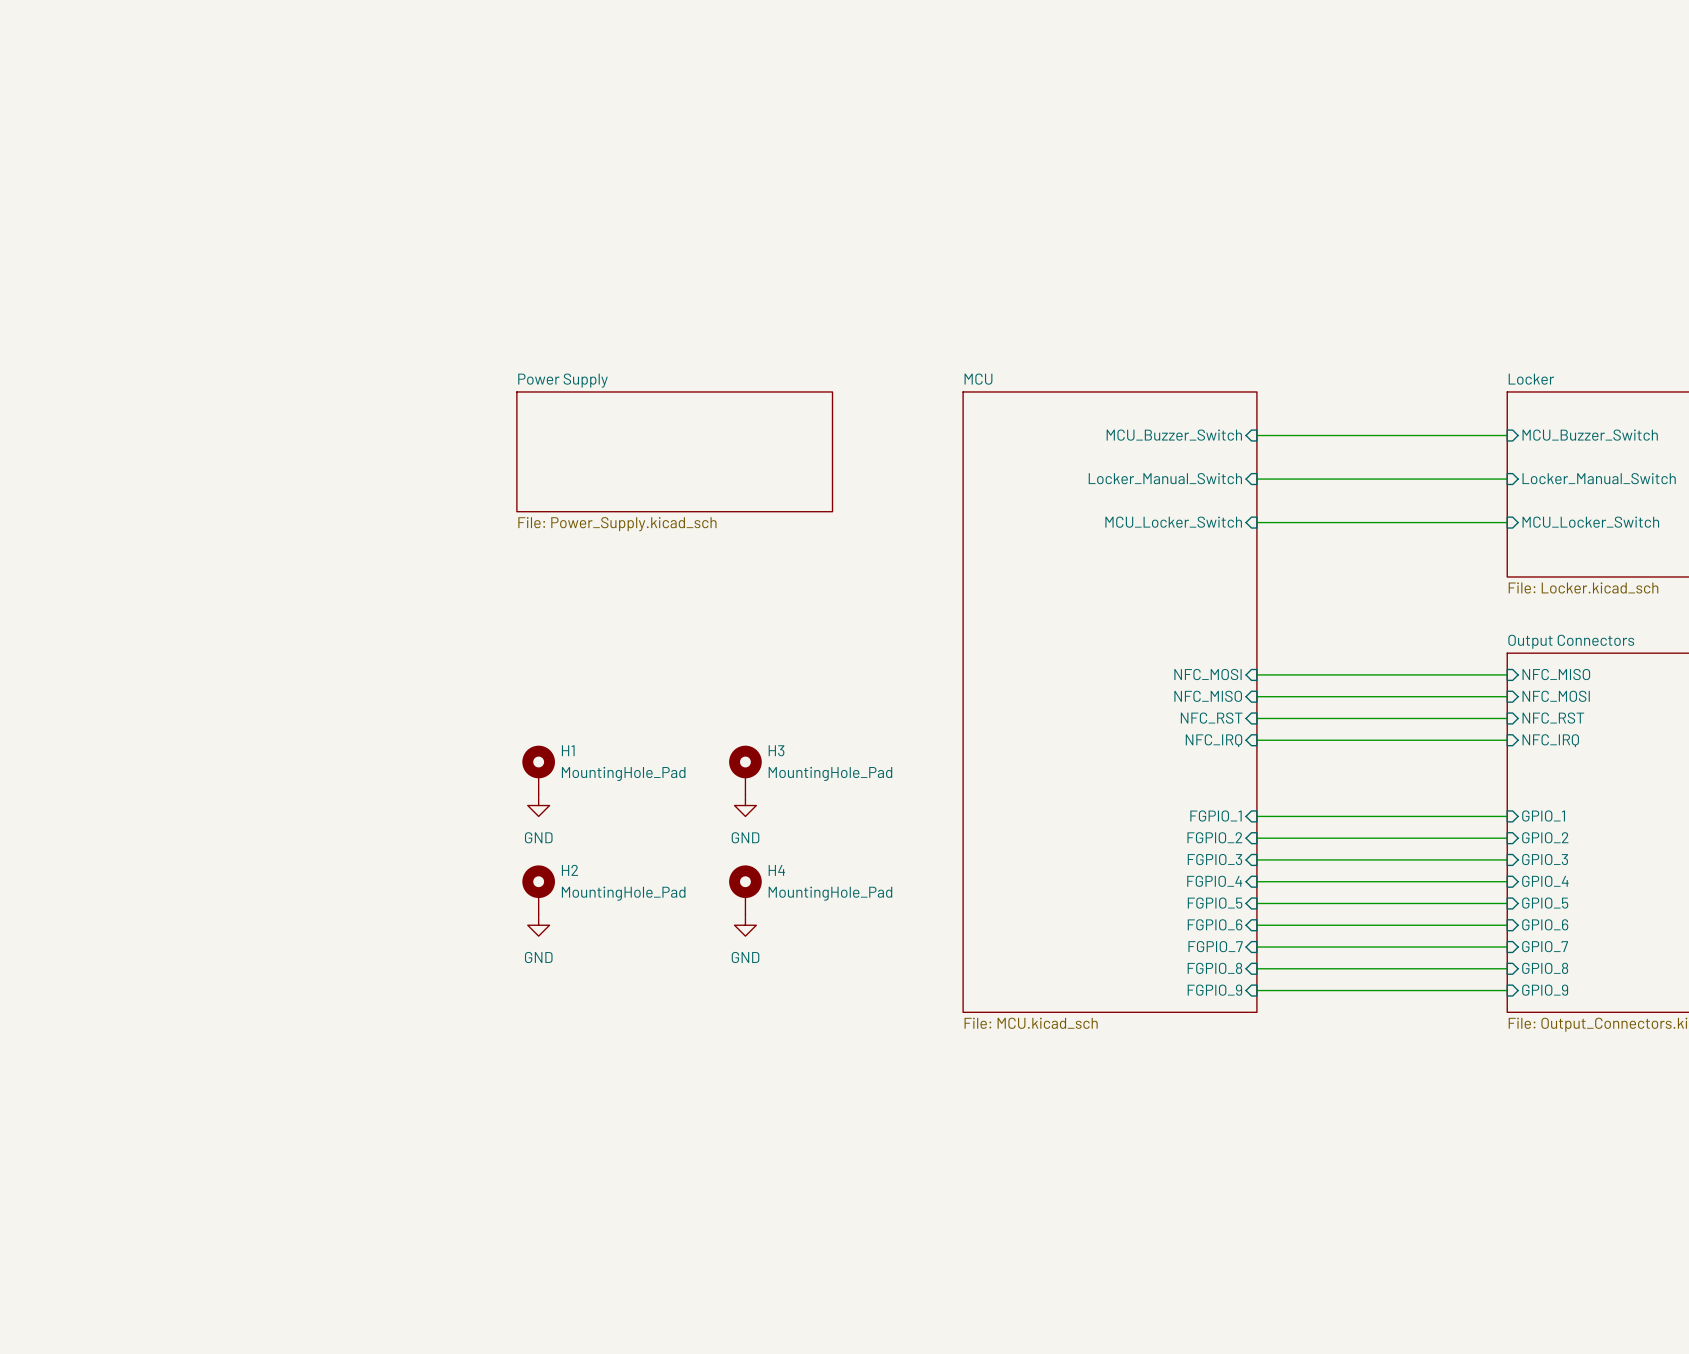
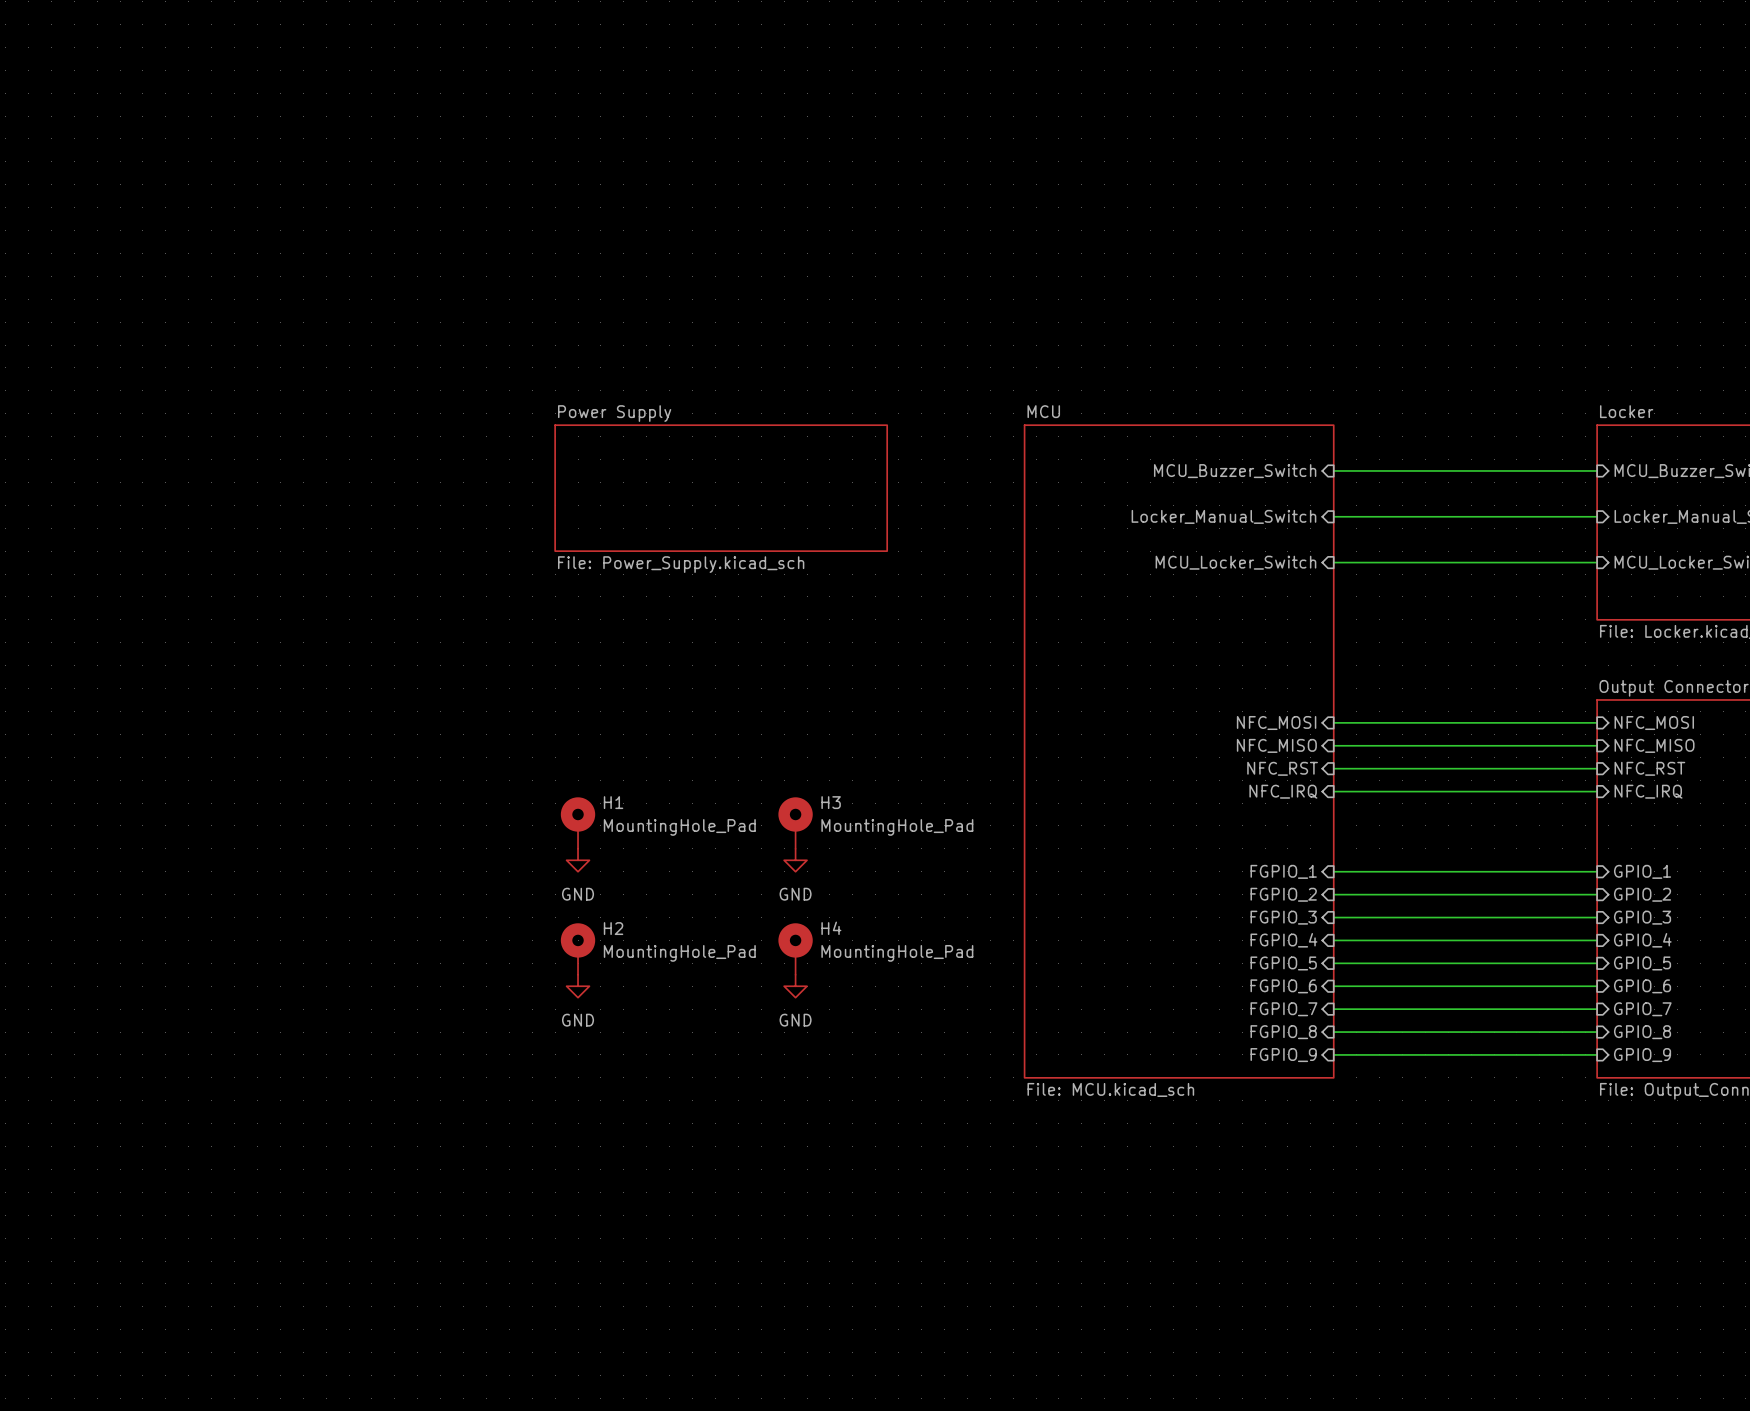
sheet pin: NFC_MISO (1556, 674) -> NFC_MOSI (1654, 723)
sheet pin: NFC_MOSI (1556, 696) -> NFC_MISO (1654, 745)

